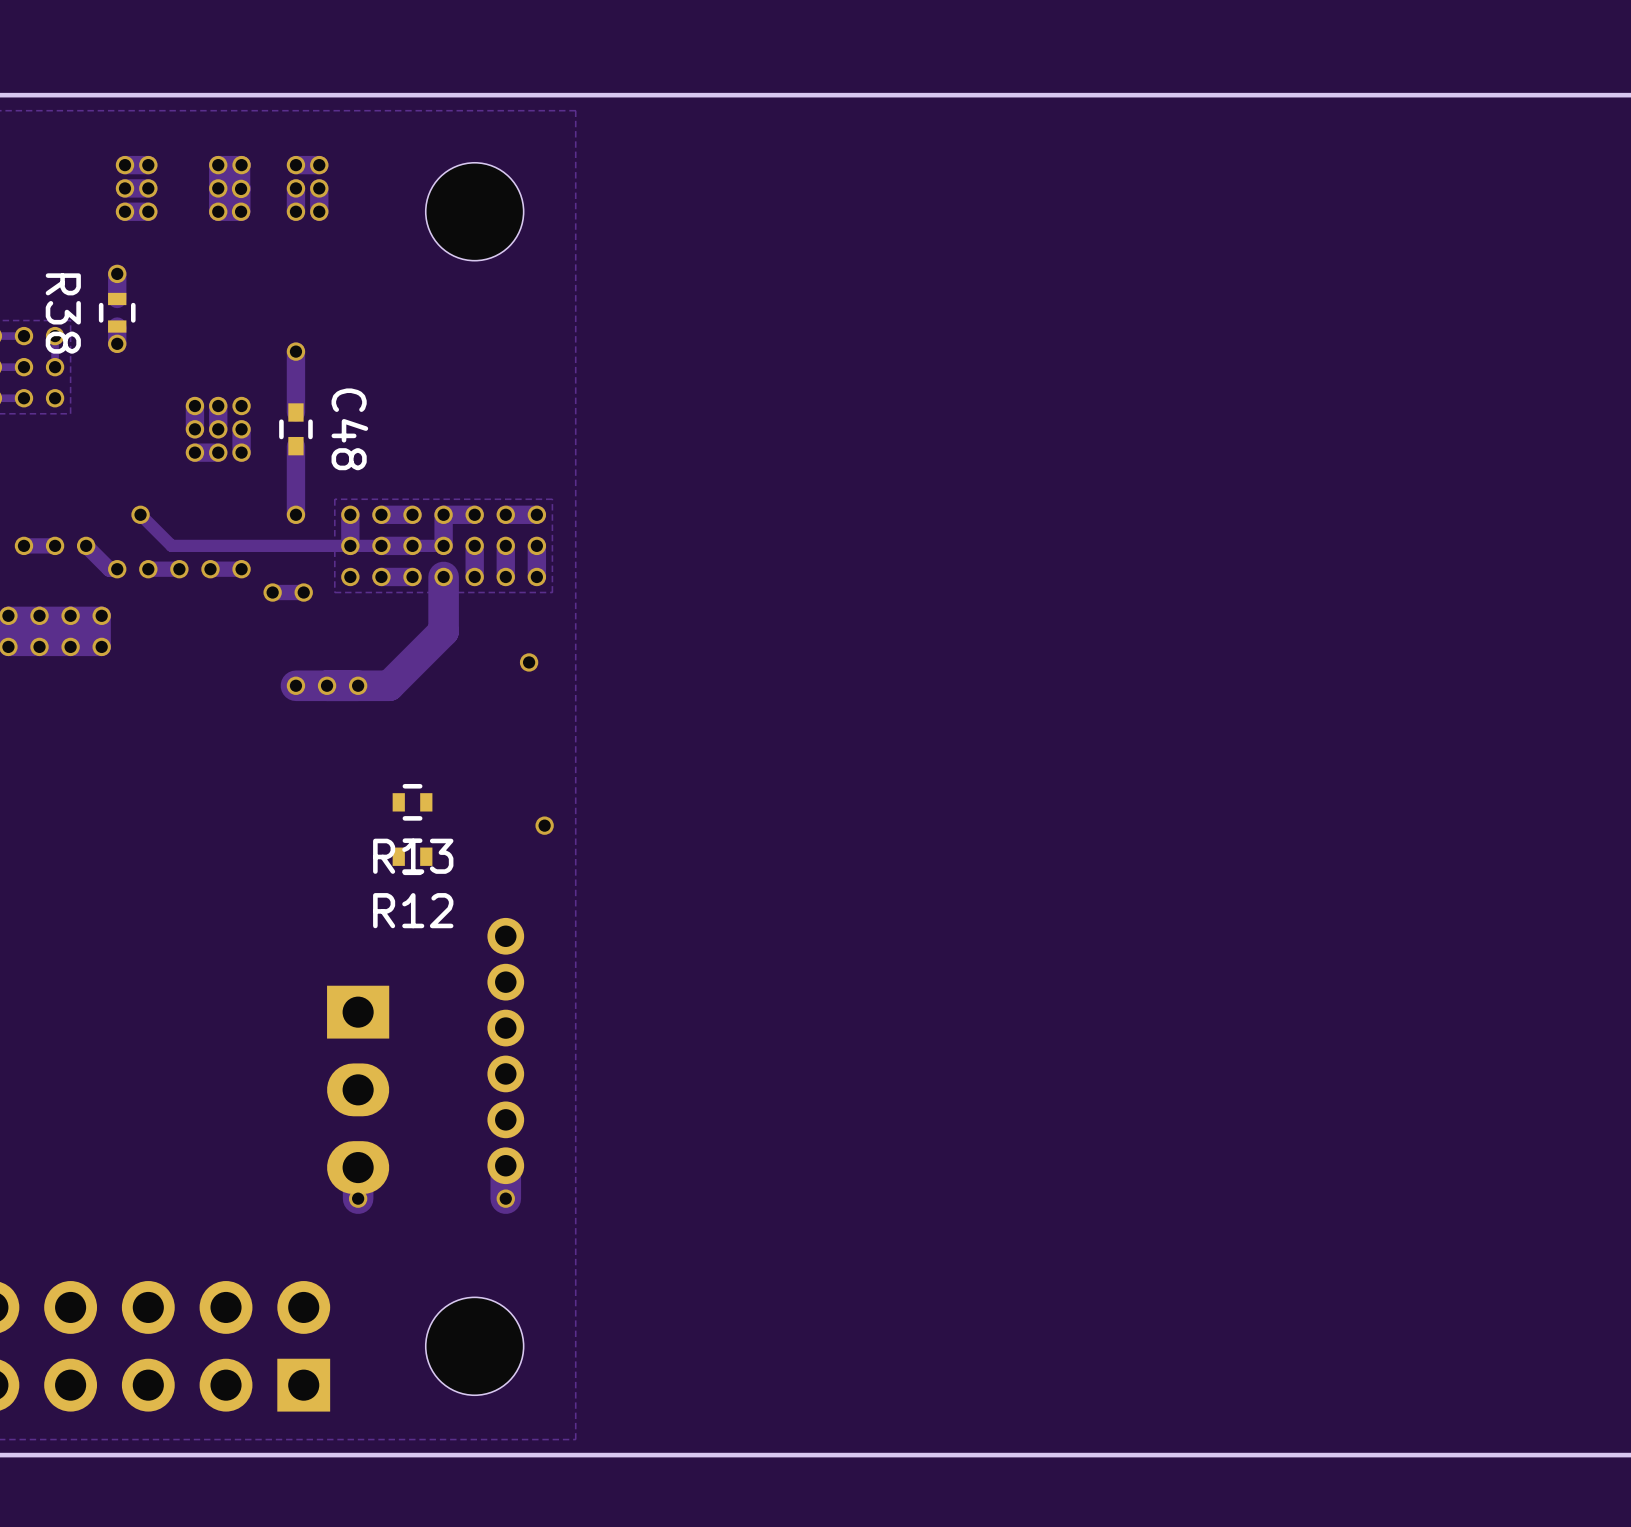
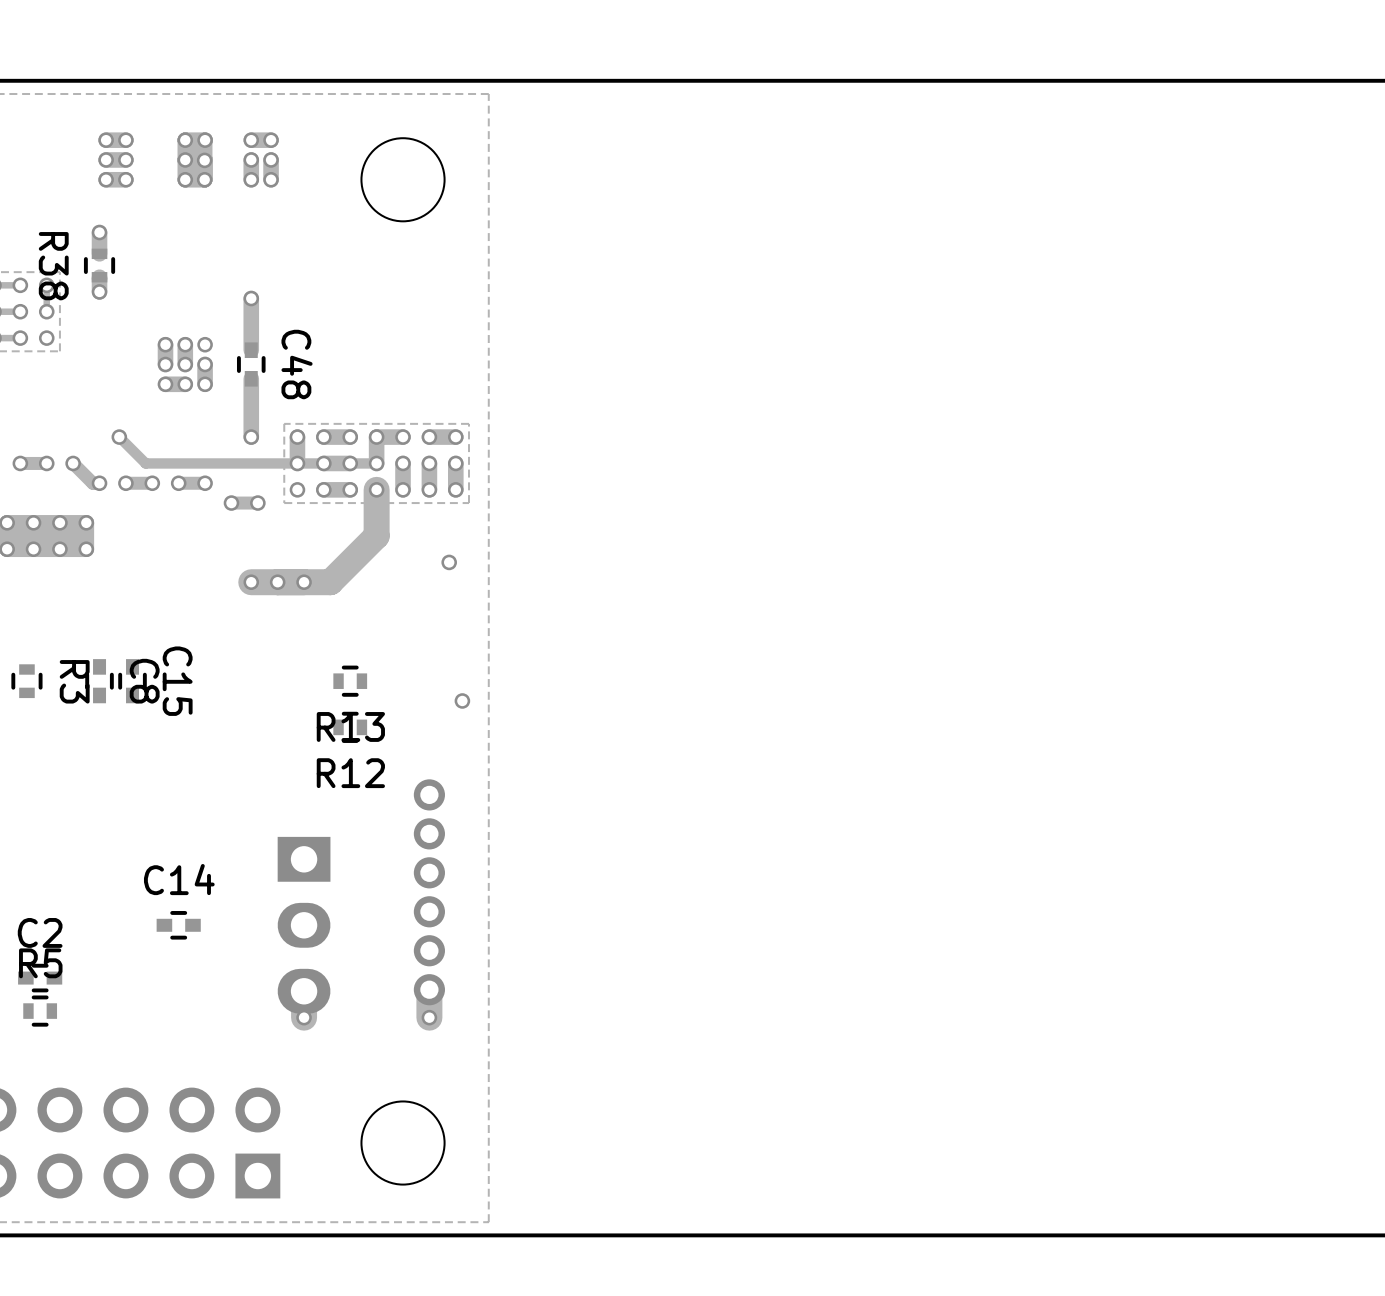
R3: none -> (26, 681)
C8: none -> (99, 681)
C15: none -> (132, 681)
C14: none -> (178, 925)
C2: none -> (40, 978)
R5: none -> (40, 1011)

